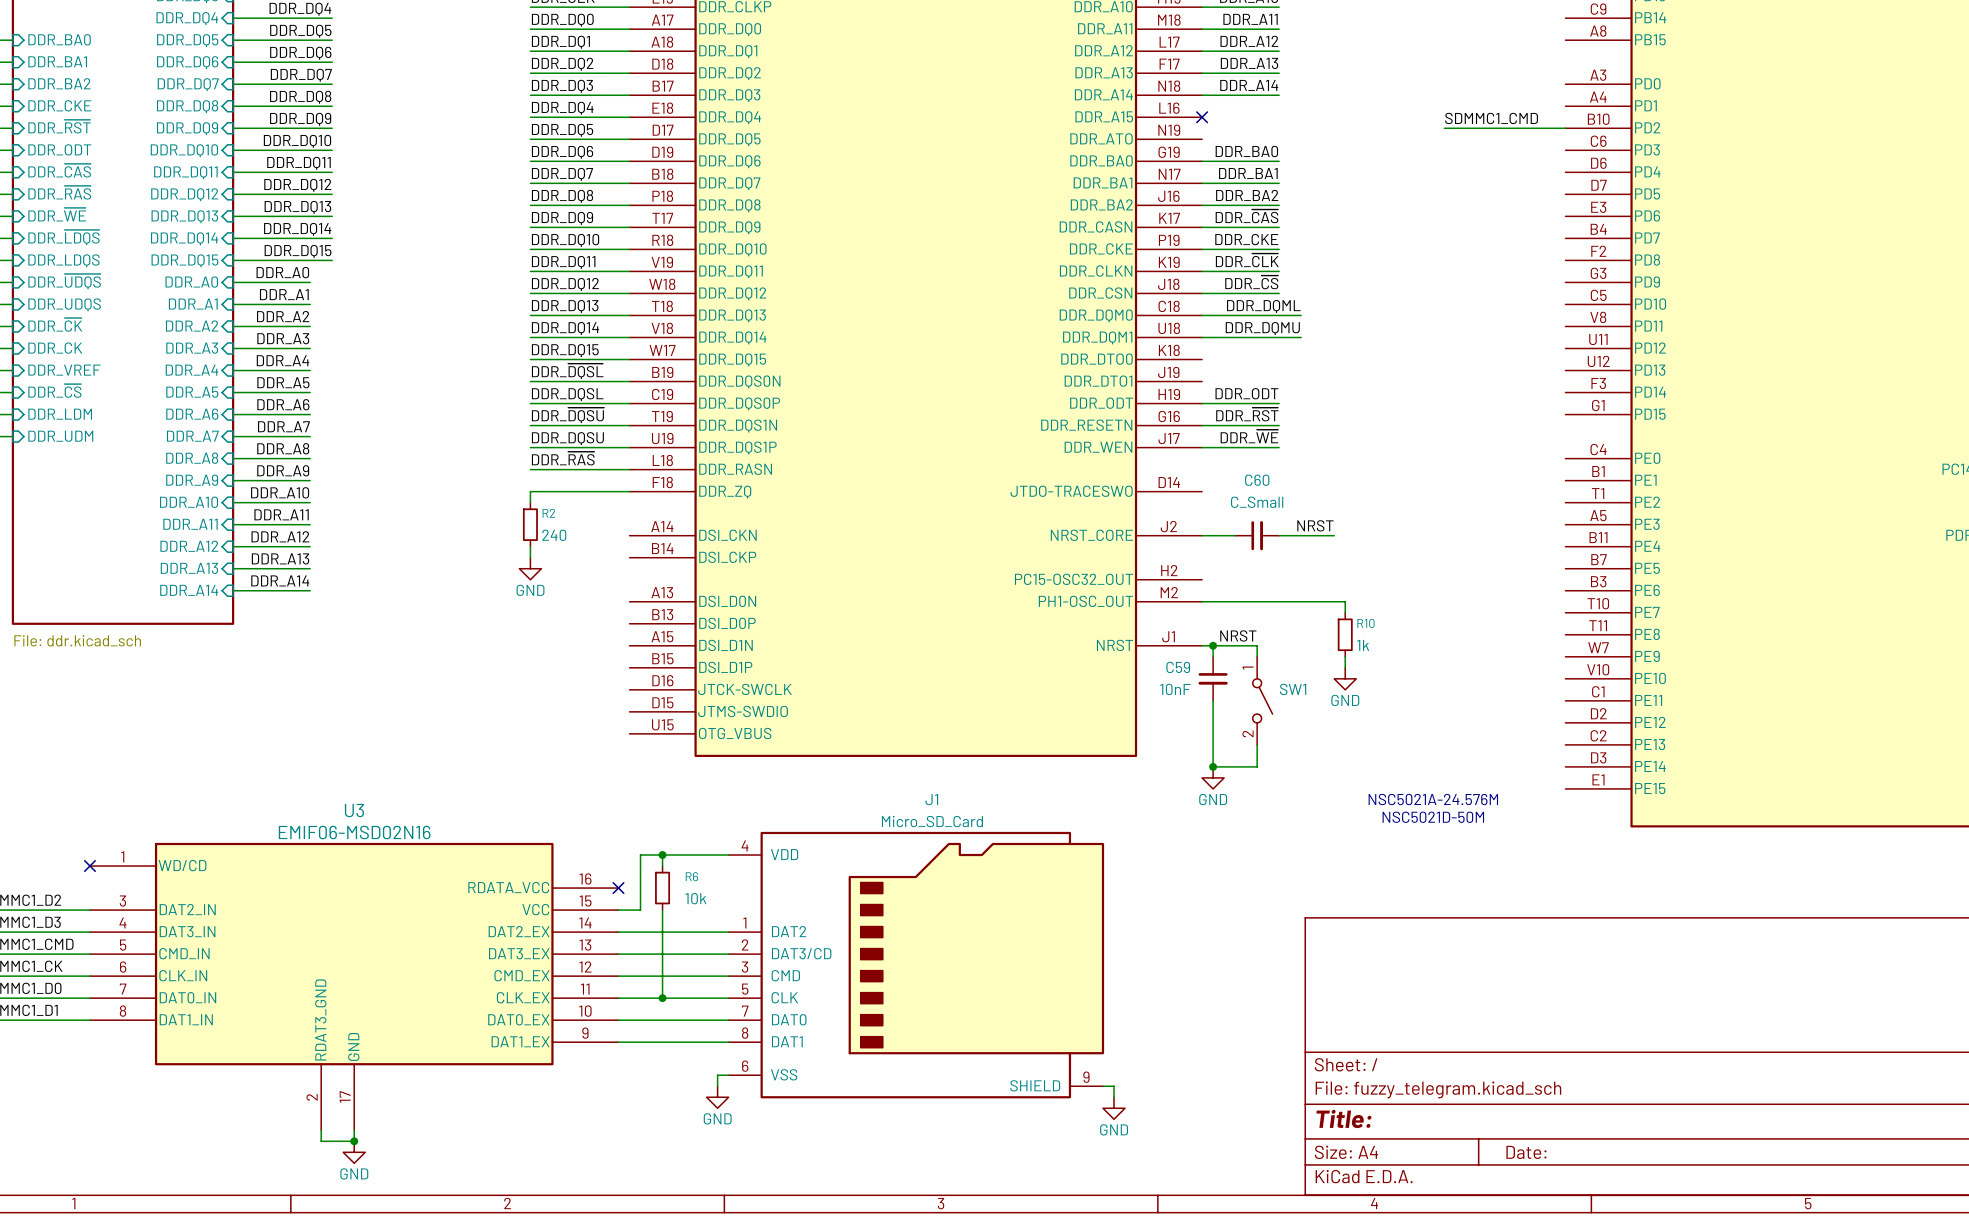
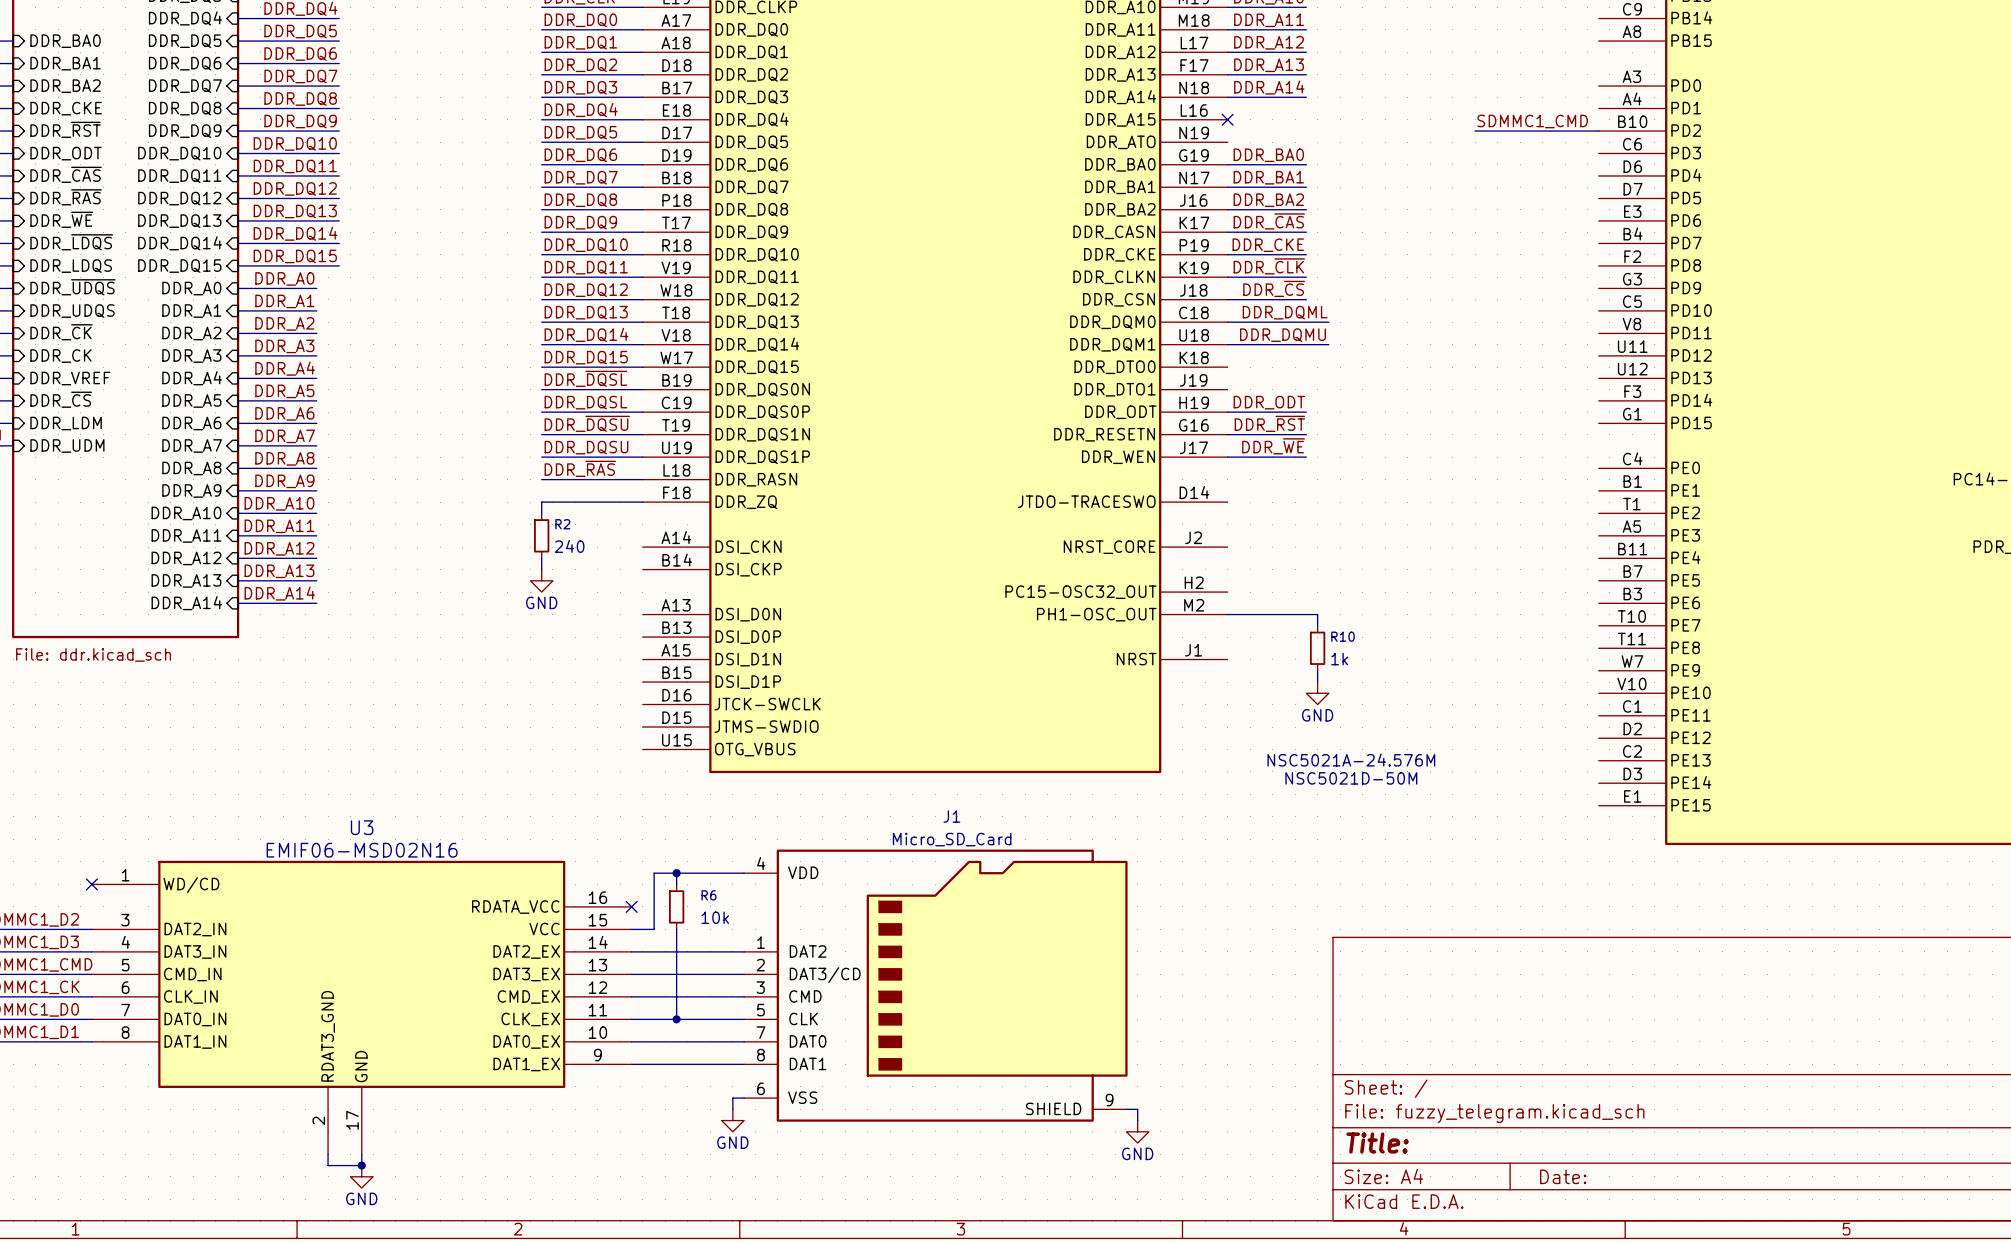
label: NRST (1315, 525) -> none
wire: (1202, 535) (1235, 535) -> none
C60: C_Small (1257, 535) -> none
wire: (1279, 535) (1334, 535) -> none
wire: (1290, 601) (1345, 601) (1345, 612) -> (1317, 614) (1317, 625)
R10 position: (1345, 634) -> (1317, 648)
label: NRST (1238, 635) -> none
wire: (1202, 645) (1257, 645) (1257, 656) -> none
wire: (1213, 645) (1213, 656) -> none
junction: (1213, 645) -> none
wire: (1345, 656) (1345, 667) -> (1317, 670) (1317, 682)
C59: 10nF (1213, 678) -> none
power symbol position: GND (1345, 678) -> GND (1317, 693)
wire: (1213, 700) (1213, 766) (1257, 766) (1257, 744) -> none
SW1: (1262, 700) -> none
junction: (1213, 766) -> none
power symbol: GND (1213, 777) -> none
text position: NSC5021A-24.576M (1433, 799) -> NSC5021A-24.576M (1351, 760)
text position: NSC5021D-50M (1433, 817) -> NSC5021D-50M (1351, 778)

